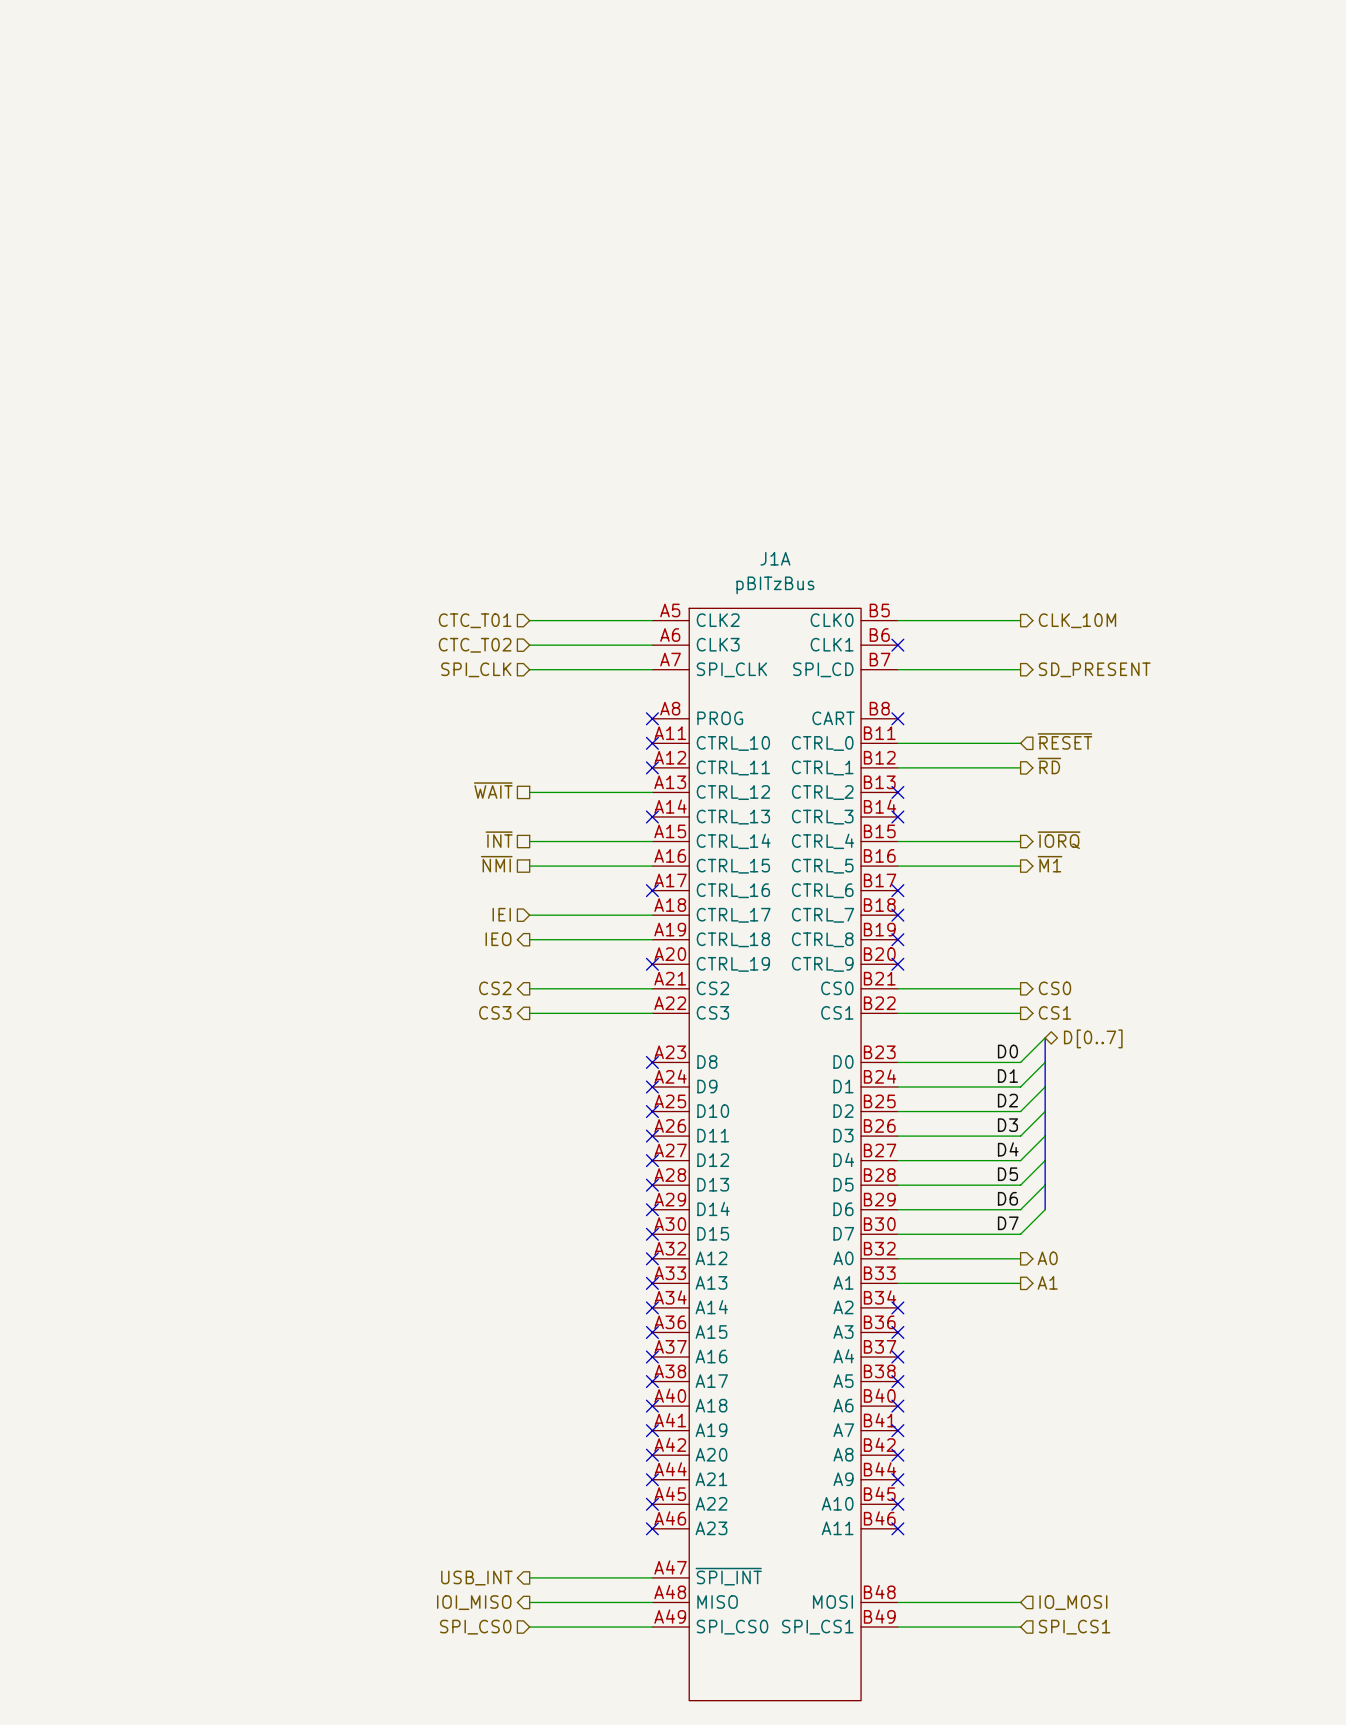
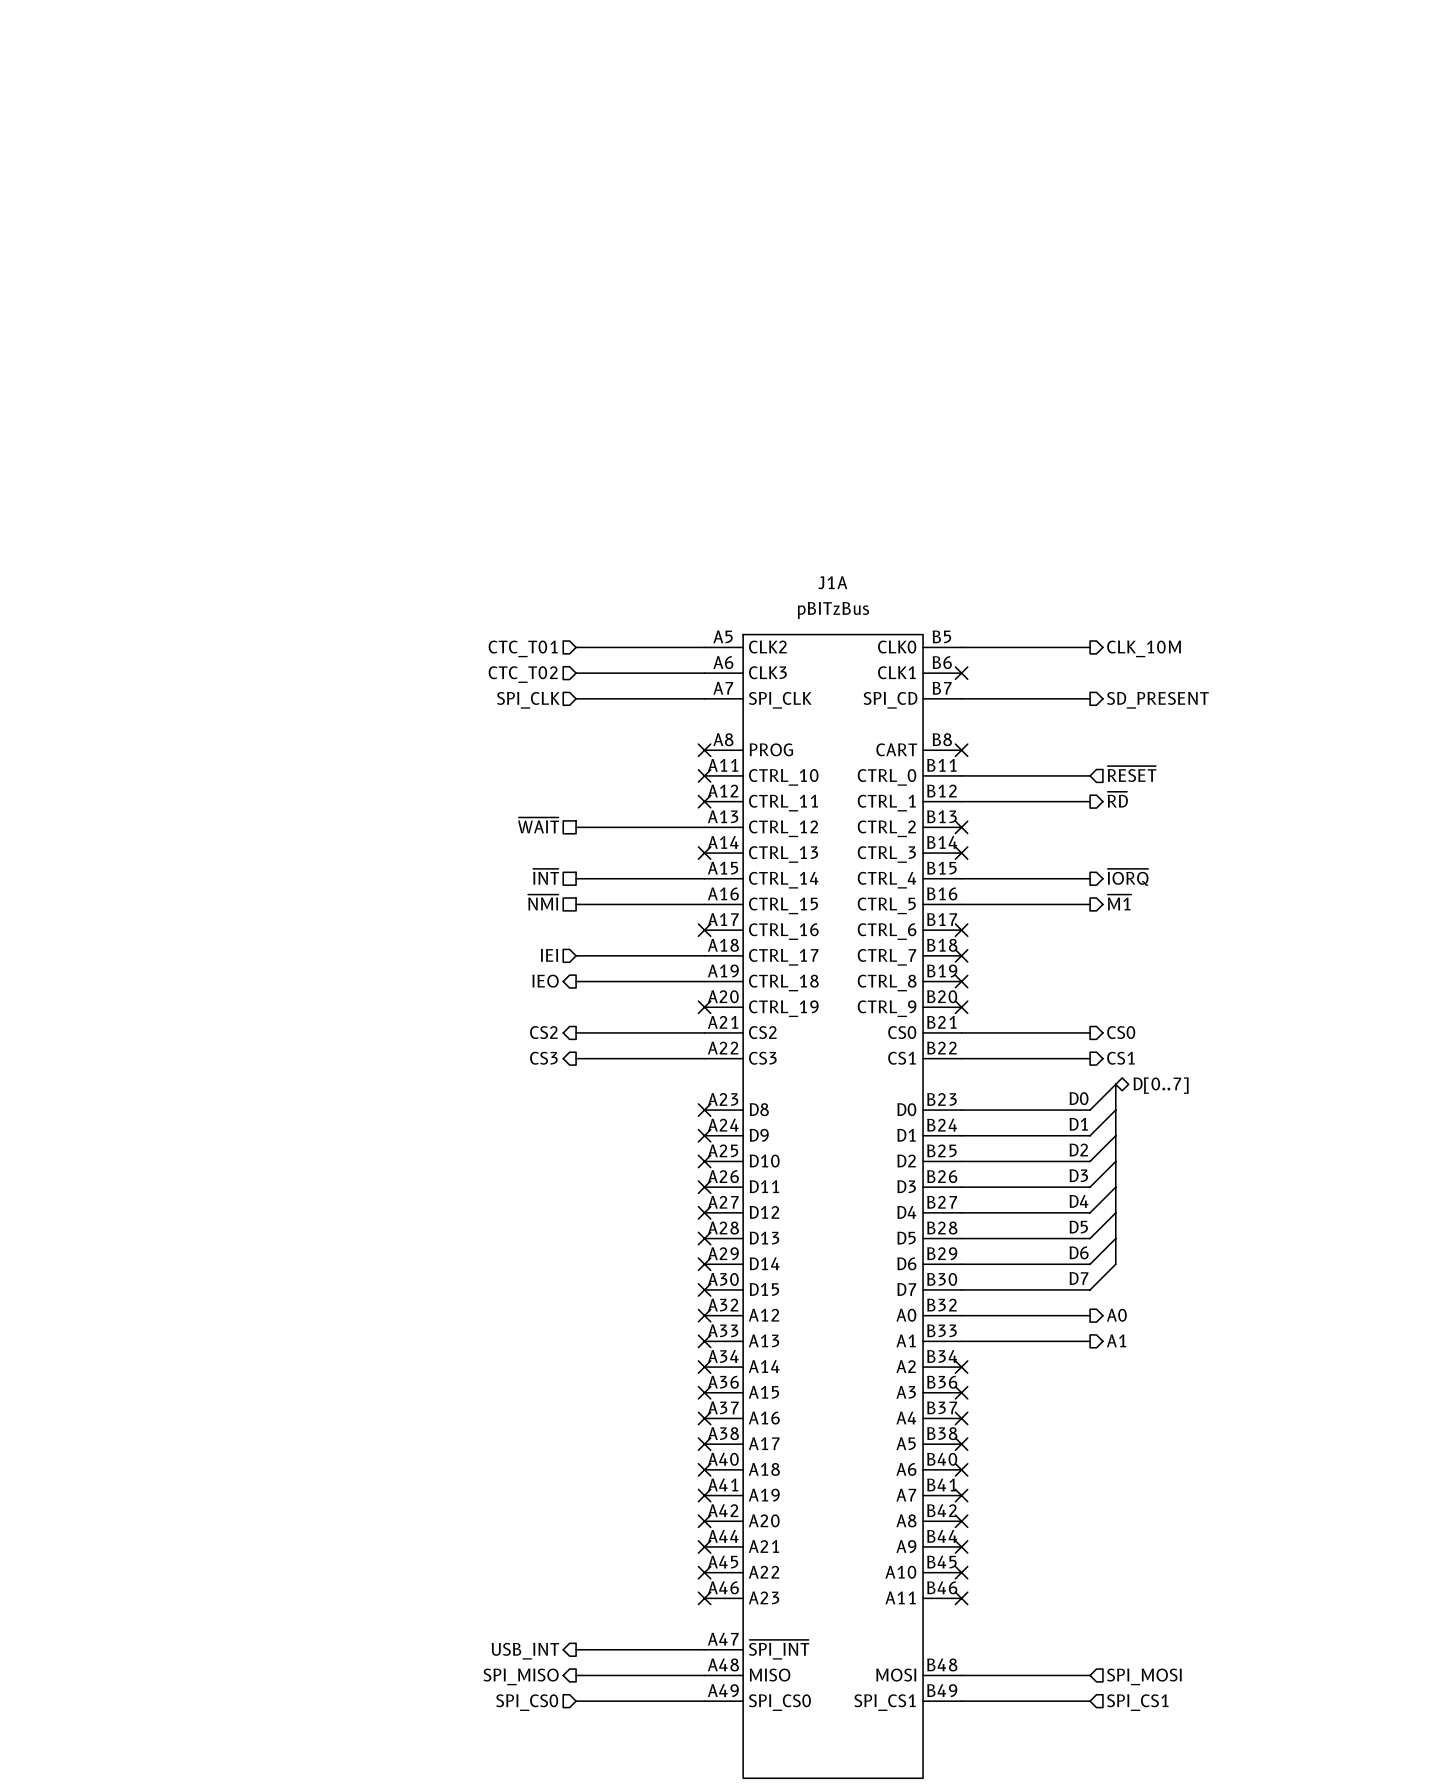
hierarchical label: IOI_MISO (474, 1602) -> SPI_MISO (521, 1676)
hierarchical label: IO_MOSI (1073, 1602) -> SPI_MOSI (1144, 1676)

